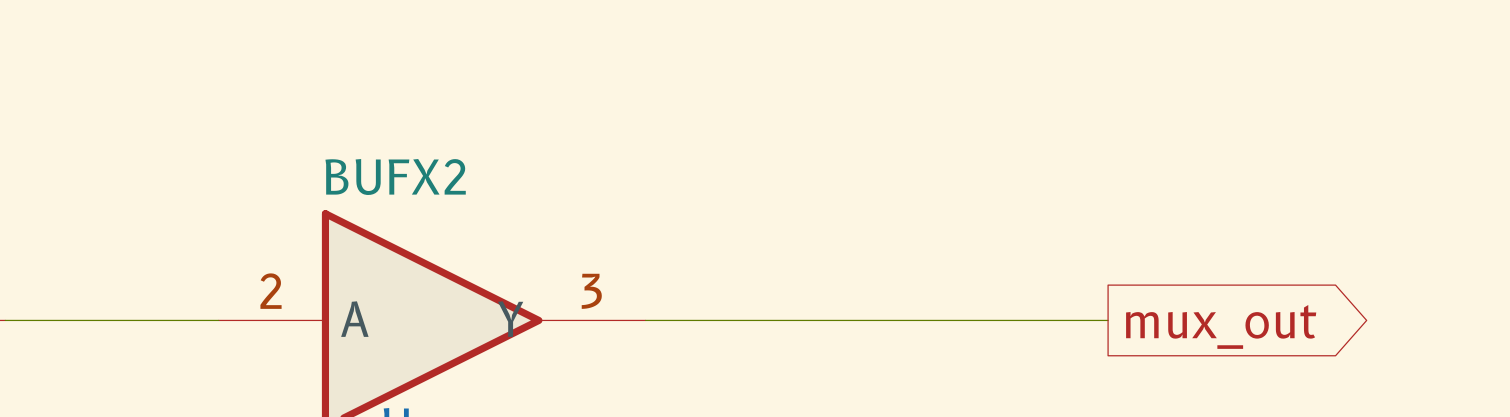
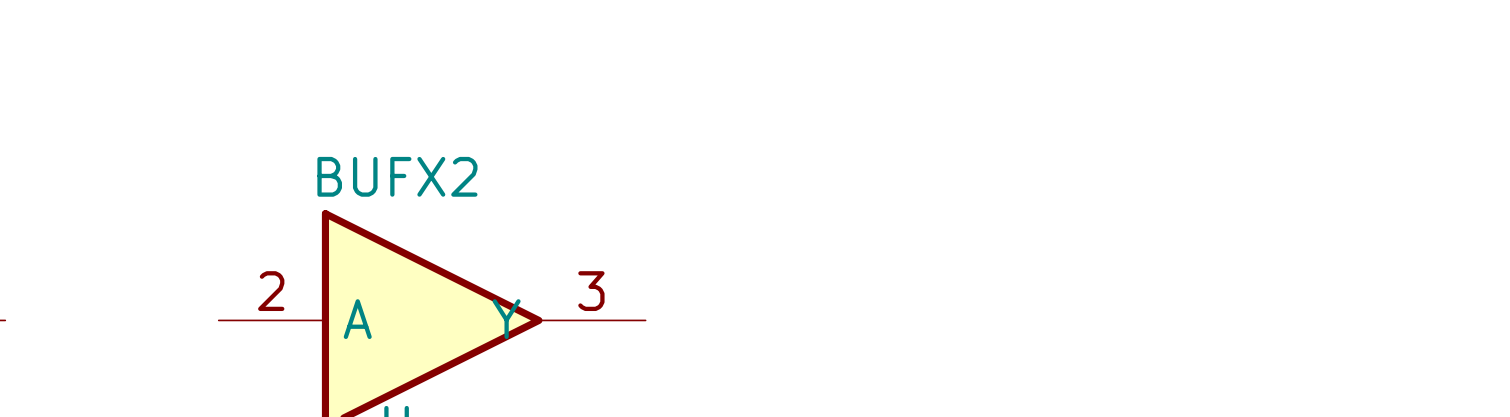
wire: (5, 320) (218, 320) -> none
wire: (645, 320) (1108, 320) -> none
global label: mux_out (1221, 326) -> none

